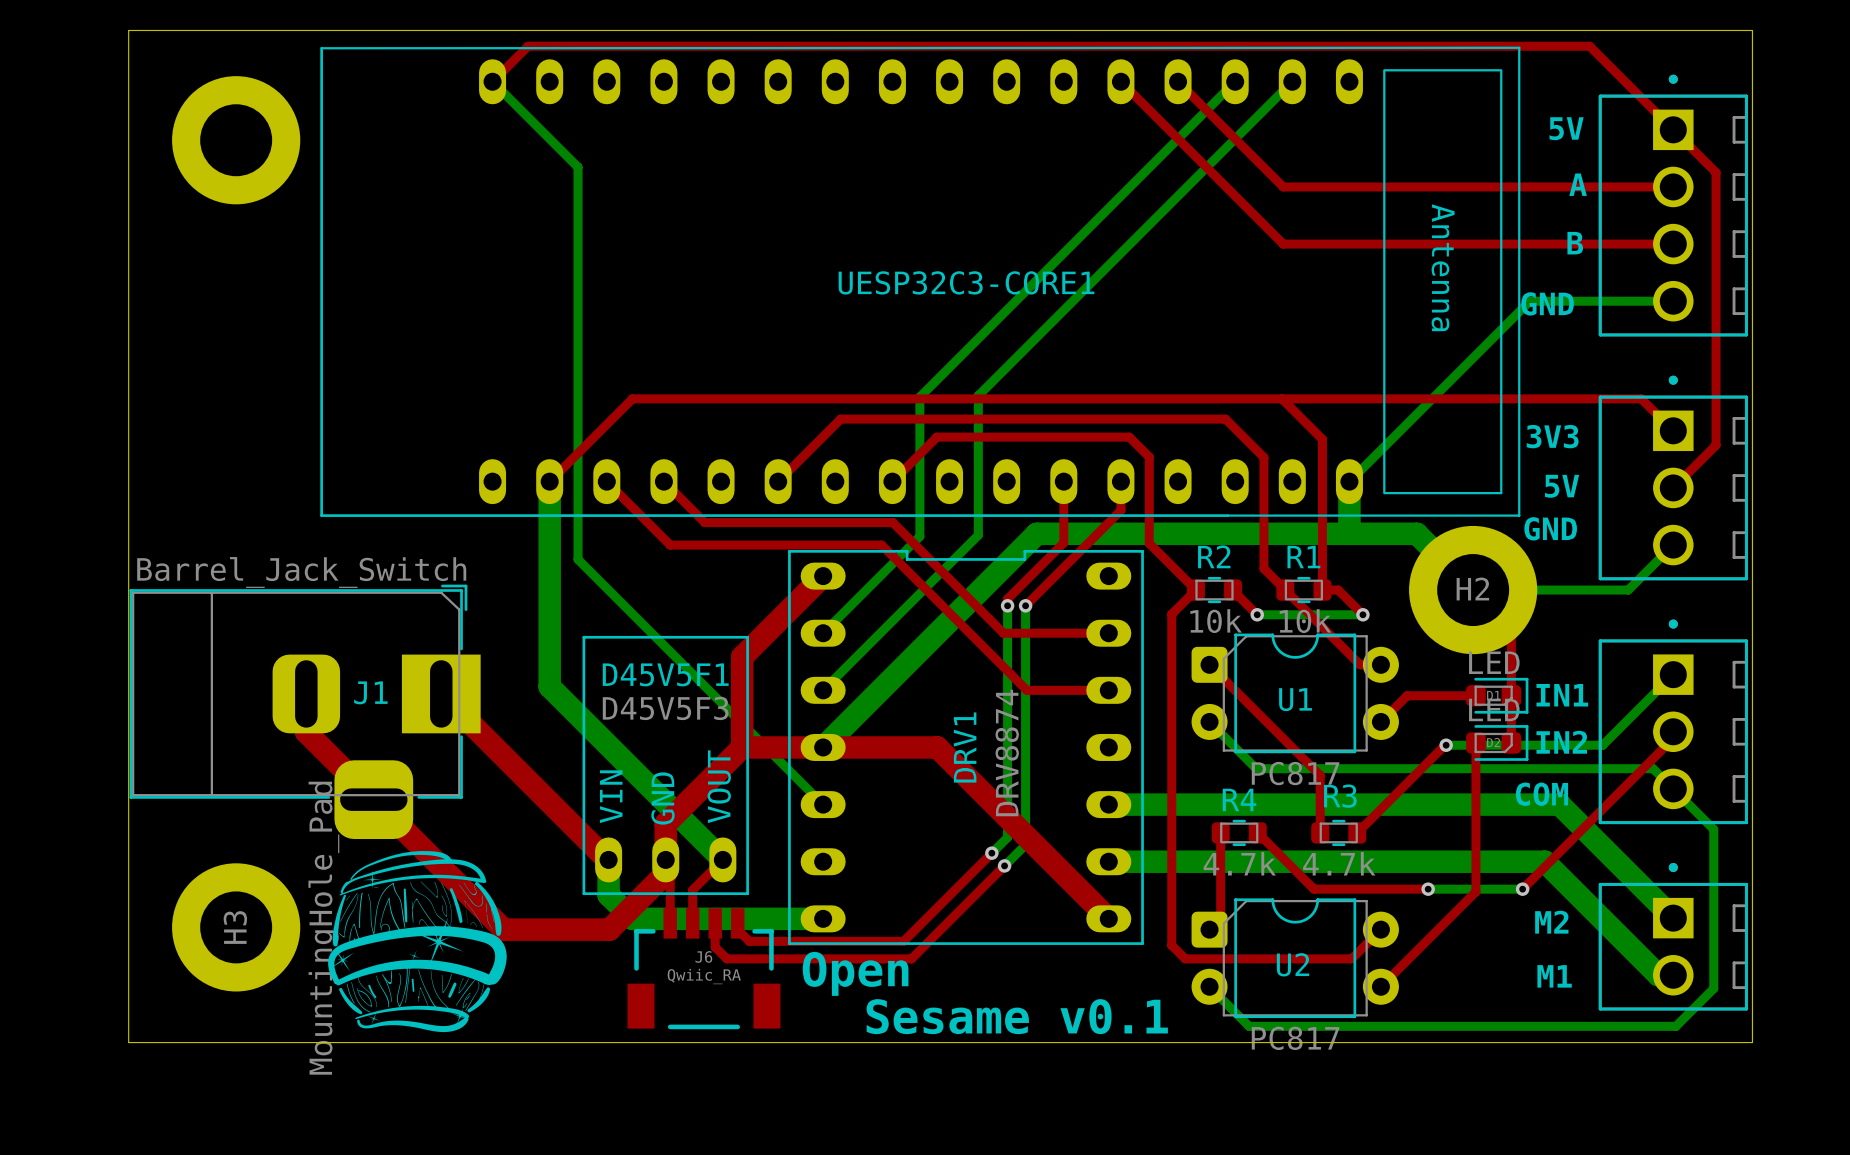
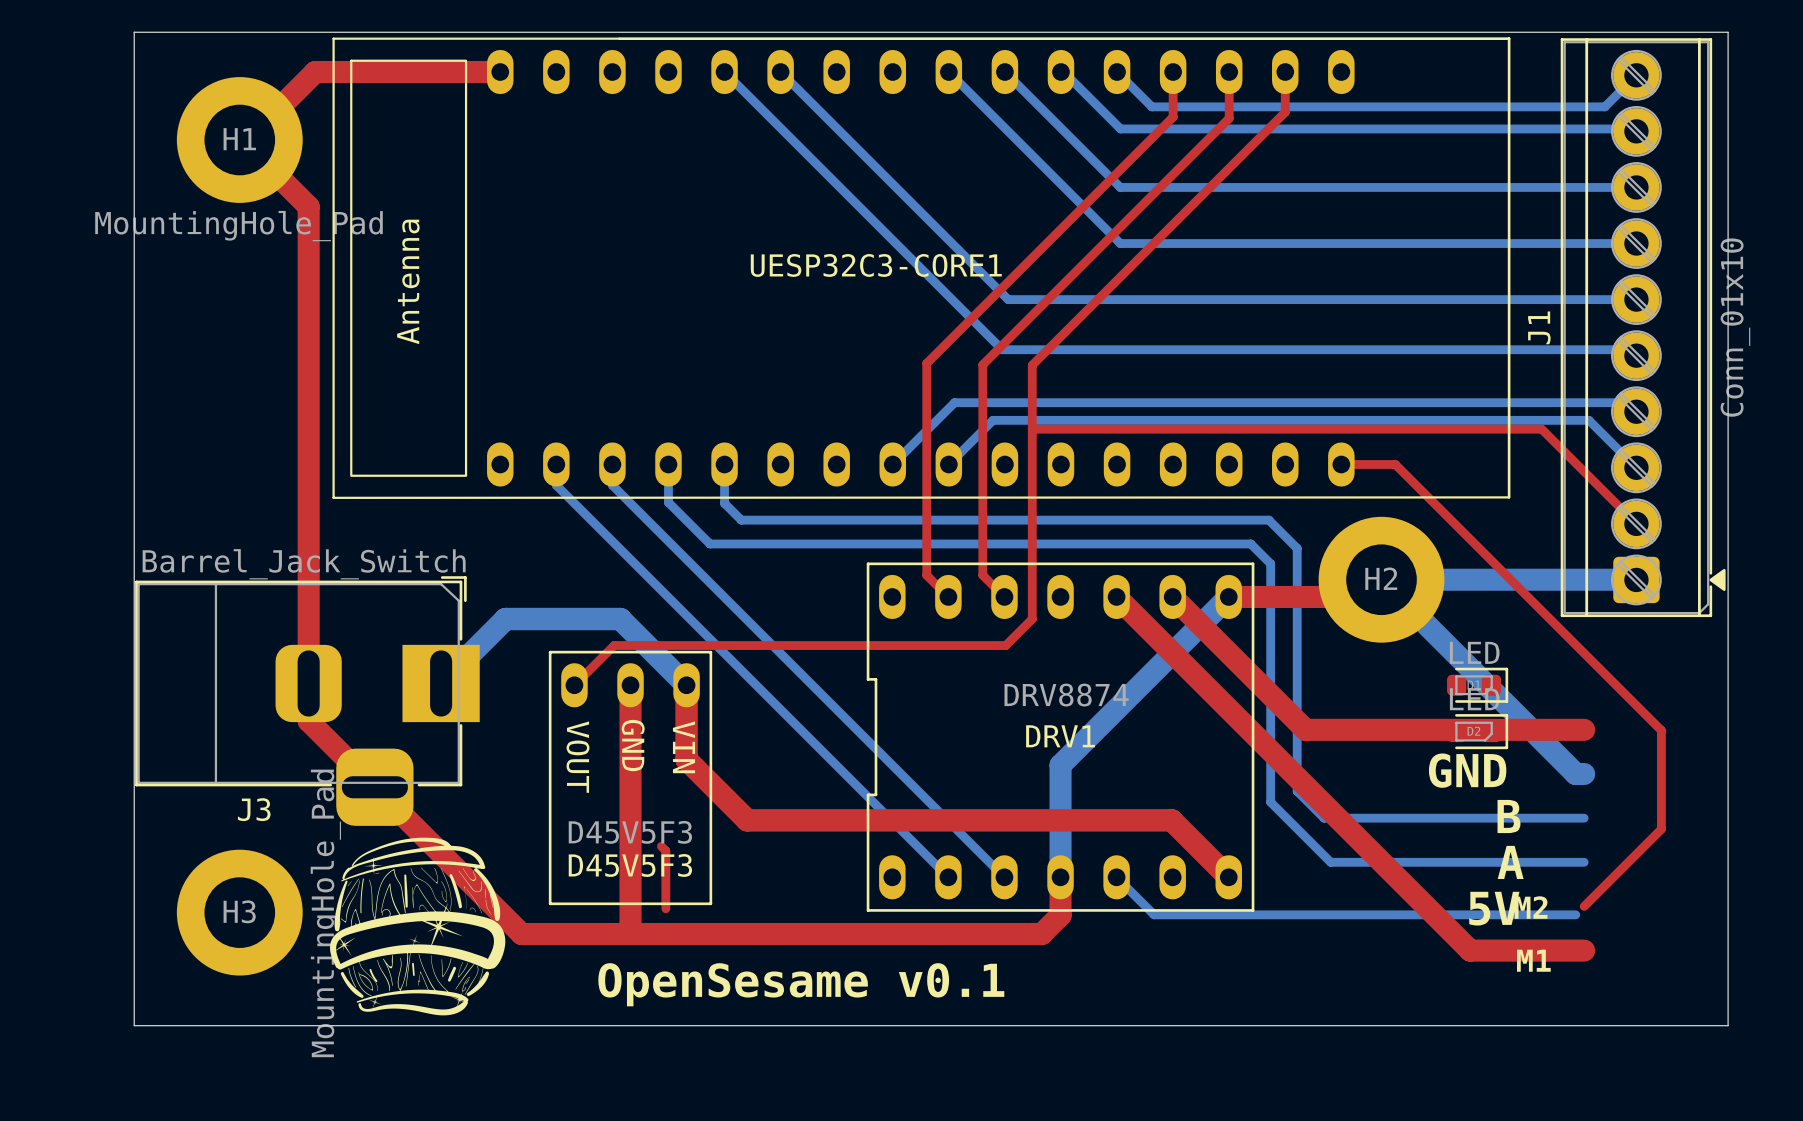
top track: none -> (500, 72) (315, 72) (244, 142) (308, 206) (308, 683)
bottom track: none -> (724, 72) (1002, 349) (1630, 349)
bottom track: none -> (780, 72) (1008, 299) (1636, 299)
bottom track: none -> (948, 72) (1120, 243) (1636, 243)
bottom track: none -> (1004, 72) (1120, 187) (1636, 187)
bottom track: none -> (1063, 72) (1120, 128) (1634, 128)
bottom track: none -> (1117, 72) (1151, 106) (1604, 106) (1636, 75)
top track: none -> (1173, 72) (1173, 117) (926, 363) (926, 575) (948, 596)
top track: none -> (1229, 72) (1229, 118) (982, 364) (982, 575) (1004, 596)
top track: none -> (1285, 72) (1285, 112) (1032, 365) (1032, 619) (1005, 645) (614, 645) (574, 685)
top track: (492, 81) (528, 46) (1589, 46) (1716, 172) (1716, 445) (1673, 487) -> none
bottom track: (492, 81) (578, 167) (578, 559) (823, 804) -> none
top track: (1120, 81) (1283, 244) (1673, 244) -> none
top track: (1178, 81) (1283, 186) (1673, 186) -> none
bottom track: (1235, 81) (919, 397) (919, 536) (823, 633) -> none
bottom track: (1292, 81) (978, 395) (978, 535) (823, 690) -> none
text: 5V (1566, 128) -> none
H1 name: none -> H1 (239, 139)
text: A (1578, 184) -> none
part: (1673, 205) -> none
H1 value: none -> MountingHole_Pad (239, 226)
text: B (1575, 243) -> none
UESP32C3-CORE1 rotation: 0° (920, 281) -> 180° (921, 268)
bottom track: (1673, 301) (1529, 301) (1349, 481) (1349, 529) (1344, 533) -> none
text: GND (1547, 303) -> none
J1: none -> Conn_01x10 (1643, 327)
top track: (1281, 398) (1322, 439) (1322, 590) (1338, 590) (1362, 614) -> none
bottom track: none -> (1627, 402) (954, 402) (892, 464)
top track: (1673, 430) (1641, 398) (632, 398) (549, 481) -> none
top track: none -> (1032, 429) (1541, 429) (1636, 523)
text: 3V3 (1552, 436) -> none
bottom track: none -> (556, 464) (556, 485) (948, 877)
bottom track: none -> (612, 464) (612, 485) (1004, 877)
bottom track: none -> (668, 464) (668, 502) (709, 543) (1250, 543) (1270, 563) (1270, 802) (1330, 862) (1584, 862)
bottom track: none -> (724, 464) (724, 503) (741, 520) (1268, 520) (1297, 548) (1297, 791) (1324, 818) (1584, 818)
bottom track: none -> (948, 464) (992, 420) (1588, 420) (1636, 467)
top track: none -> (1341, 464) (1395, 464) (1661, 730) (1661, 829) (1584, 906)
part: (1673, 477) -> none
bottom track: (549, 481) (549, 686) (722, 859) -> none
top track: (606, 481) (670, 545) (881, 545) (1026, 690) (1108, 690) -> none
top track: (663, 481) (704, 522) (892, 522) (1003, 633) (1108, 633) -> none
top track: (778, 481) (840, 419) (1225, 419) (1263, 457) (1263, 568) (1360, 664) (1380, 664) -> none
top track: (892, 481) (936, 437) (1129, 437) (1149, 457) (1149, 543) (1195, 590) (1171, 614) (1171, 945) (1185, 958) (1351, 958) (1380, 929) -> none
top track: (1063, 481) (1063, 542) (1007, 599) (1007, 605) -> none
top track: (1120, 481) (1120, 510) (1025, 605) -> none
text: 5V (1562, 486) -> none
text: GND (1550, 528) -> none
bottom track: (1673, 545) (1628, 590) (1473, 590) (1416, 533) (1036, 533) (823, 747) -> none
top track: (823, 576) (742, 657) (742, 747) -> none
bottom track: none -> (1636, 579) (1381, 579) (1575, 774) (1584, 774)
R2: 10k (1214, 590) -> none
top track: (1233, 590) (1257, 614) -> none
R1: 10k (1303, 590) -> none
H2 position: (1473, 590) -> (1381, 579)
bottom track: (1007, 605) (1007, 837) (991, 853) -> none
via: (1007, 605) -> none
bottom track: (1025, 605) (1025, 844) (1004, 865) -> none
via: (1025, 605) -> none
top track: none -> (1116, 596) (1470, 950) (1584, 950)
top track: none -> (1172, 596) (1305, 729) (1584, 729)
top track: none -> (1228, 596) (1364, 596)
bottom track: none -> (1228, 596) (1060, 765) (1060, 877)
bottom track: (1257, 614) (1362, 614) -> none
via: (1257, 614) -> none
via: (1362, 614) -> none
top track: (1511, 628) (1511, 742) -> none
top track: (1209, 664) (1320, 775) (1320, 832) -> none
bottom track: (1673, 674) (1602, 745) (1446, 745) -> none
J1 name: J1 (370, 692) -> J3 (254, 809)
top track: (441, 693) (608, 859) -> none
bottom track: none -> (441, 683) (505, 619) (620, 619) (686, 685)
U1: PC817 (1295, 693) -> none
top track: none -> (630, 685) (630, 927) (623, 934)
top track: none -> (686, 685) (686, 759) (747, 820) (1171, 820) (1228, 877)
top track: (1475, 695) (1407, 695) (1380, 721) -> none
text: IN1 (1562, 695) -> none
bottom track: (1209, 721) (1256, 768) (1653, 768) (1713, 829) (1713, 988) (1675, 1026) (1249, 1026) (1209, 986) -> none
part: (1673, 721) -> none
top track: (1673, 738) (1522, 889) -> none
top track: (1475, 742) (1475, 891) (1380, 986) -> none
text: IN2 (1561, 742) -> none
top track: (1446, 745) (1357, 832) -> none
via: (1446, 745) -> none
top track: (742, 747) (665, 823) (665, 873) (609, 929) (503, 929) -> (1060, 877) (1060, 915) (1041, 934) (521, 934) (502, 914)
top track: (742, 747) (937, 747) (1108, 918) -> none
DRV1 rotation: 0° (965, 747) -> 90° counterclockwise (1060, 737)
D45V5F1: D45V5F3 (665, 765) -> none
text: none -> GND (1467, 770)
D45V5F3: none -> D45V5F3 (630, 777)
text: COM (1541, 794) -> none
bottom track: (1108, 804) (1559, 804) (1673, 918) -> none
text: none -> B (1509, 816)
top track: (1220, 832) (1220, 918) -> none
R4: 4.7k (1239, 832) -> none
top track: (1257, 832) (1314, 889) (1428, 889) -> none
R3: 4.7k (1338, 832) -> none
top track: (991, 853) (903, 941) (749, 941) (737, 929) (737, 923) -> none
via: (991, 853) -> none
bottom track: (608, 859) (608, 895) (632, 918) (823, 918) -> none
top track: (722, 859) (692, 890) (692, 923) -> none
bottom track: (1108, 861) (1544, 861) (1658, 975) (1673, 975) -> none
top track: (1004, 865) (911, 958) (726, 958) (715, 947) (715, 923) -> none
via: (1004, 865) -> none
text: none -> A (1510, 862)
bottom track: (1428, 889) (1522, 889) -> none
via: (1428, 889) -> none
via: (1522, 889) -> none
bottom track: none -> (1116, 877) (1154, 914) (1575, 914)
text: none -> 5V (1494, 908)
H3 name rotation: 0° (235, 927) -> 90° clockwise (239, 911)
part: (1673, 936) -> none
U2: PC817 (1295, 958) -> none
J6: Qwiic_RA (703, 968) -> none
text: Open (855, 973) -> none
text: Sesame v0.1 (1017, 1016) -> OpenSesame v0.1 (801, 984)

